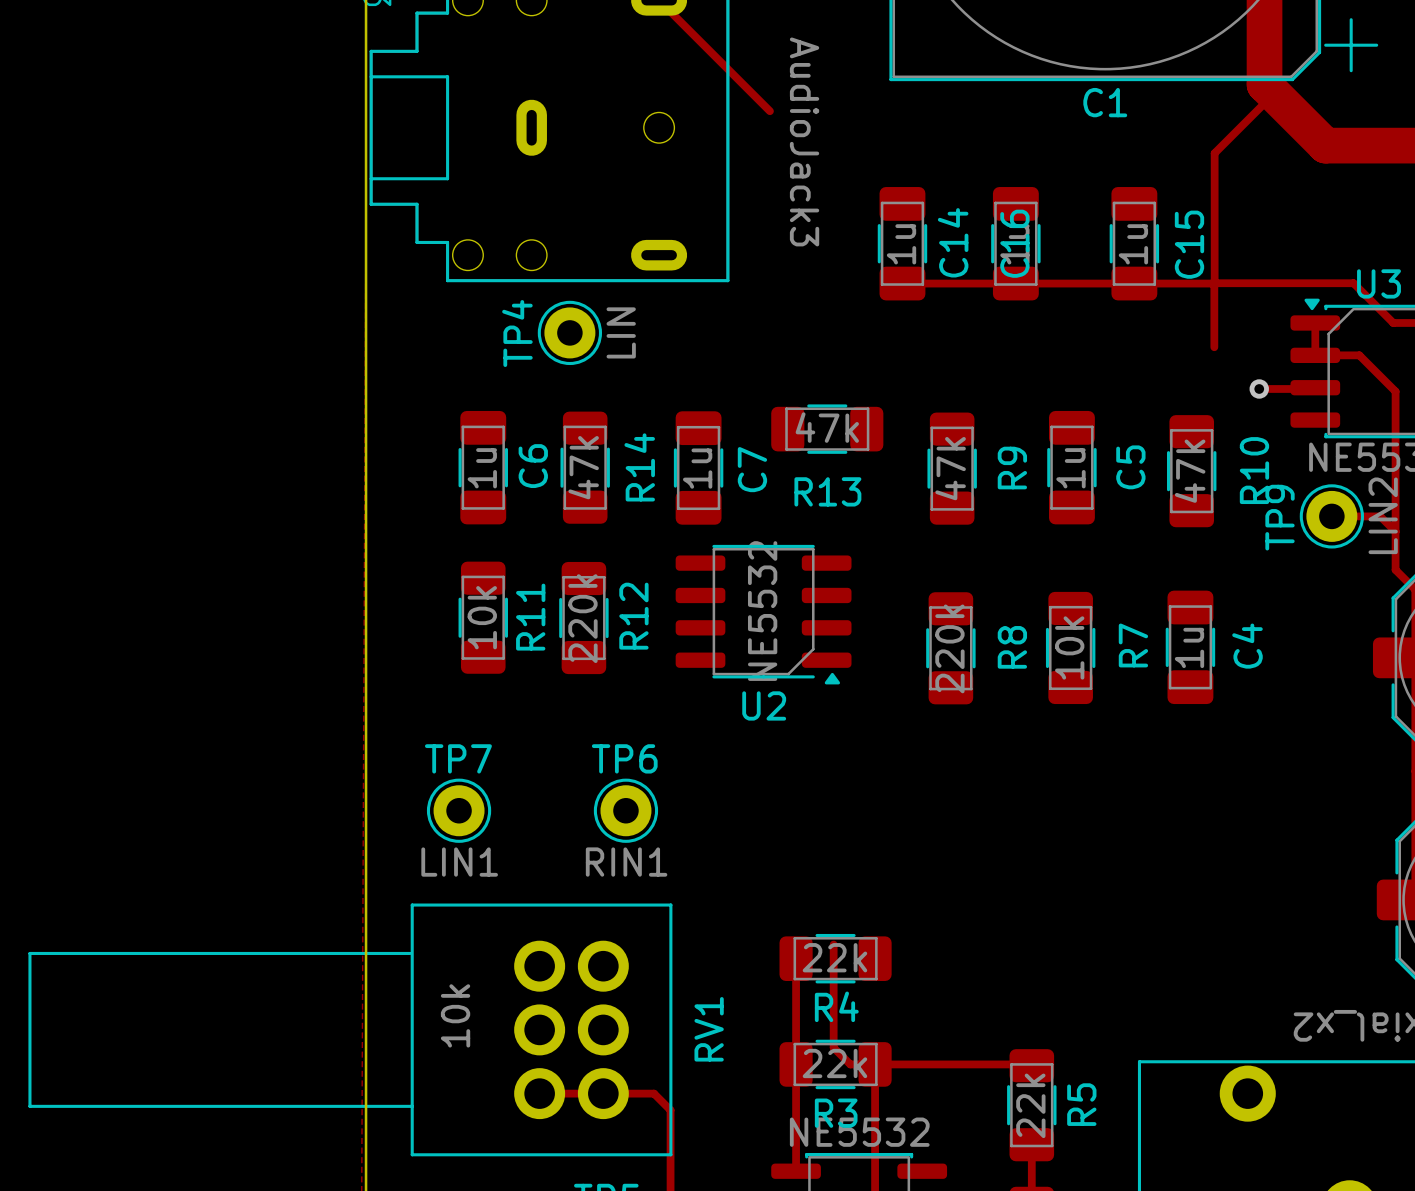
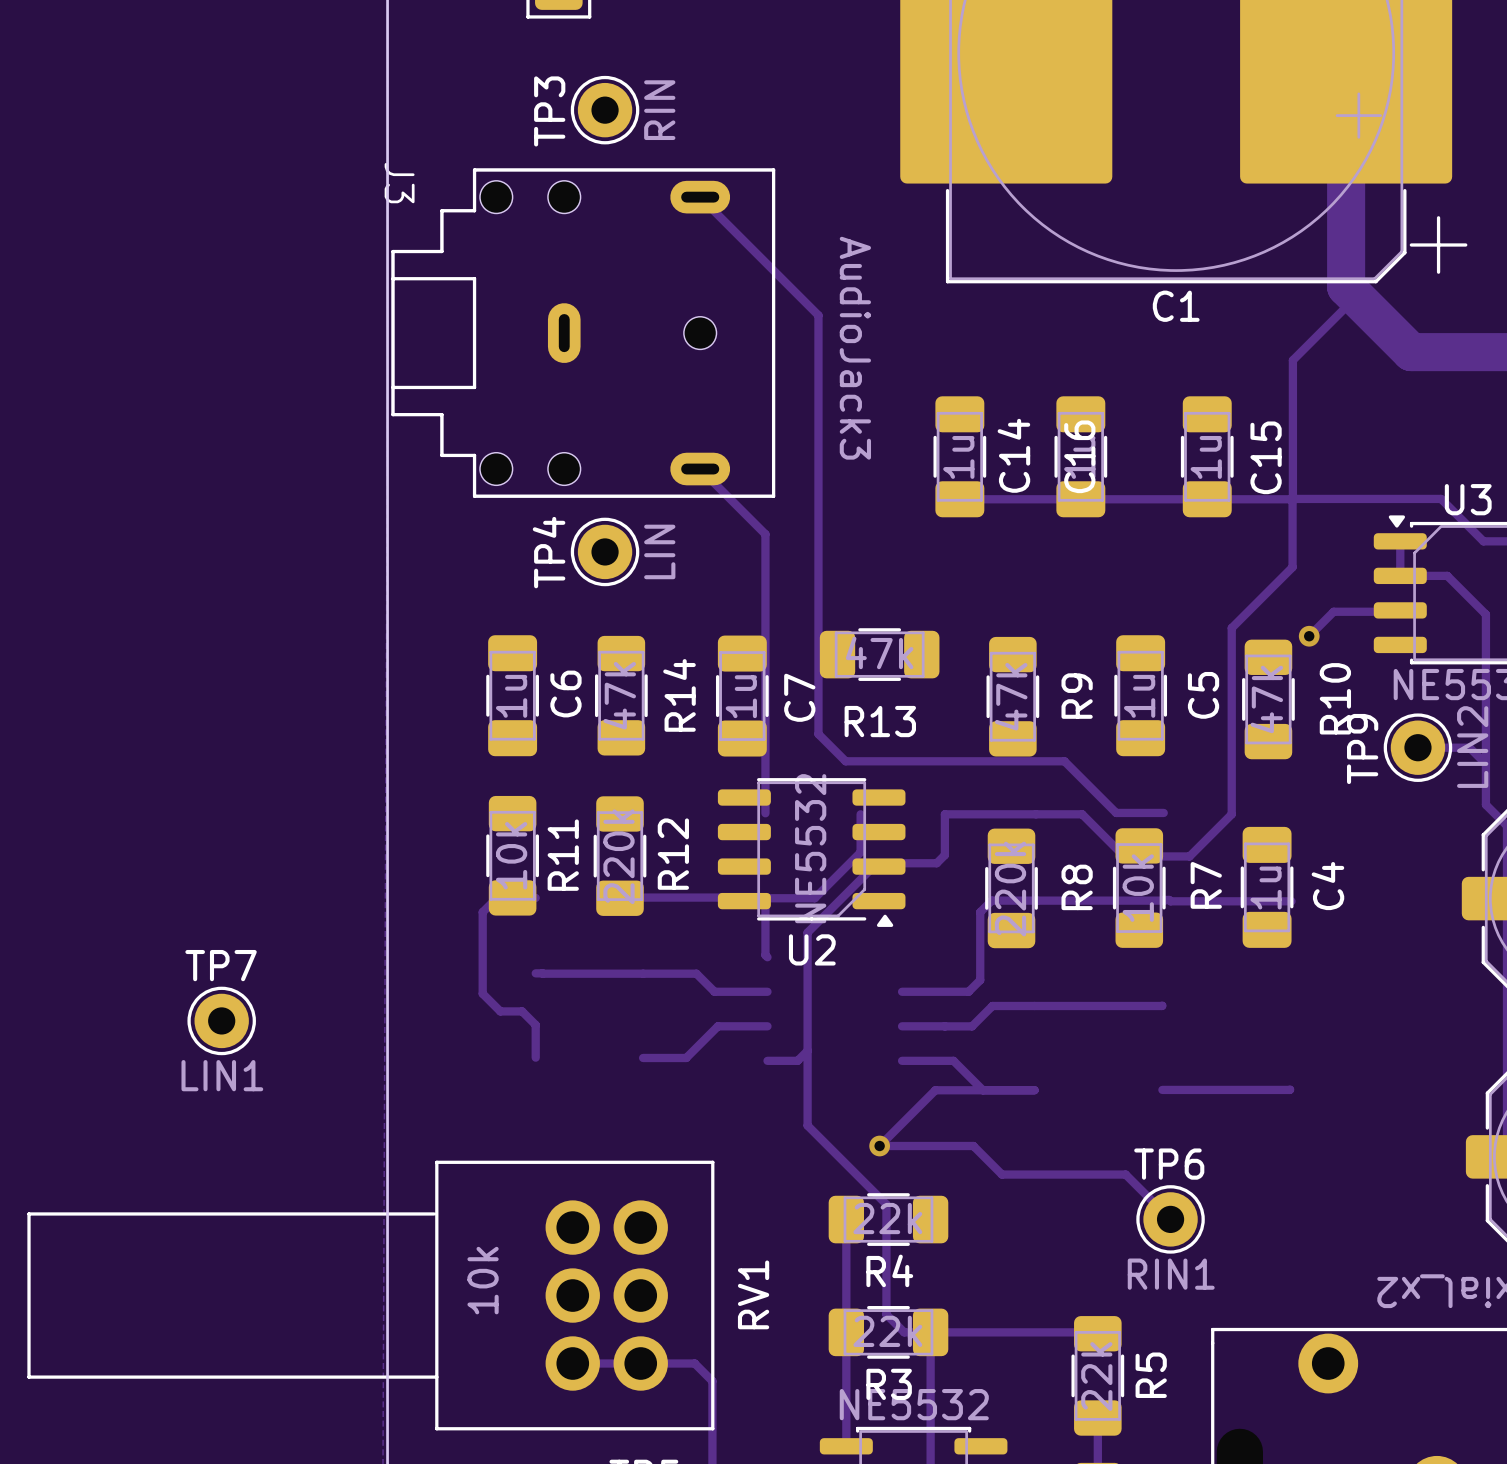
track: none -> (818, 315) (818, 734) (845, 761) (1064, 761) (1116, 812) (1163, 812)
track: none -> (700, 469) (765, 534) (765, 813)
track: none -> (1292, 567) (1231, 628) (1231, 814) (1189, 856) (1124, 856) (1082, 814) (944, 814) (944, 855) (936, 863) (876, 863) (807, 932) (807, 1125) (886, 1204)
track: none -> (1340, 611) (1333, 611) (1309, 636)
via position: (1259, 388) -> (1309, 636)
track: none -> (860, 814) (860, 852) (814, 898) (765, 898) (765, 955) (767, 957)
track: none -> (644, 897) (764, 897)
track: none -> (535, 897) (496, 897) (482, 912) (482, 993) (500, 1011) (522, 1011) (535, 1025) (535, 1057)
track: none -> (1291, 901) (991, 900) (980, 912) (980, 980) (968, 991) (902, 991)
track: none -> (535, 973) (542, 973)
track: none -> (542, 973) (696, 973) (714, 991) (767, 991)
track: none -> (1162, 1005) (992, 1005) (972, 1026) (902, 1026)
track: none -> (767, 1026) (717, 1026) (686, 1057) (643, 1057)
track: none -> (807, 1050) (797, 1060) (767, 1060)
track: none -> (902, 1060) (953, 1060) (982, 1090)
TP7 position: (459, 810) -> (221, 1020)
TP6 position: (625, 810) -> (1170, 1219)
track: none -> (1034, 1090) (935, 1090) (879, 1146) (973, 1146) (1001, 1174) (1125, 1174) (1170, 1219)
track: none -> (1162, 1089) (1289, 1089)
via: none -> (879, 1146)

